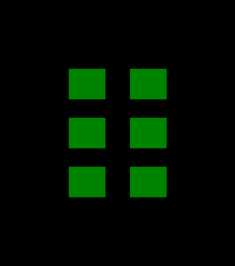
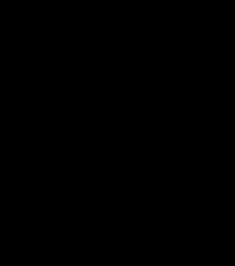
part: (117, 84) -> none
part: (117, 133) -> none
part: (117, 182) -> none

